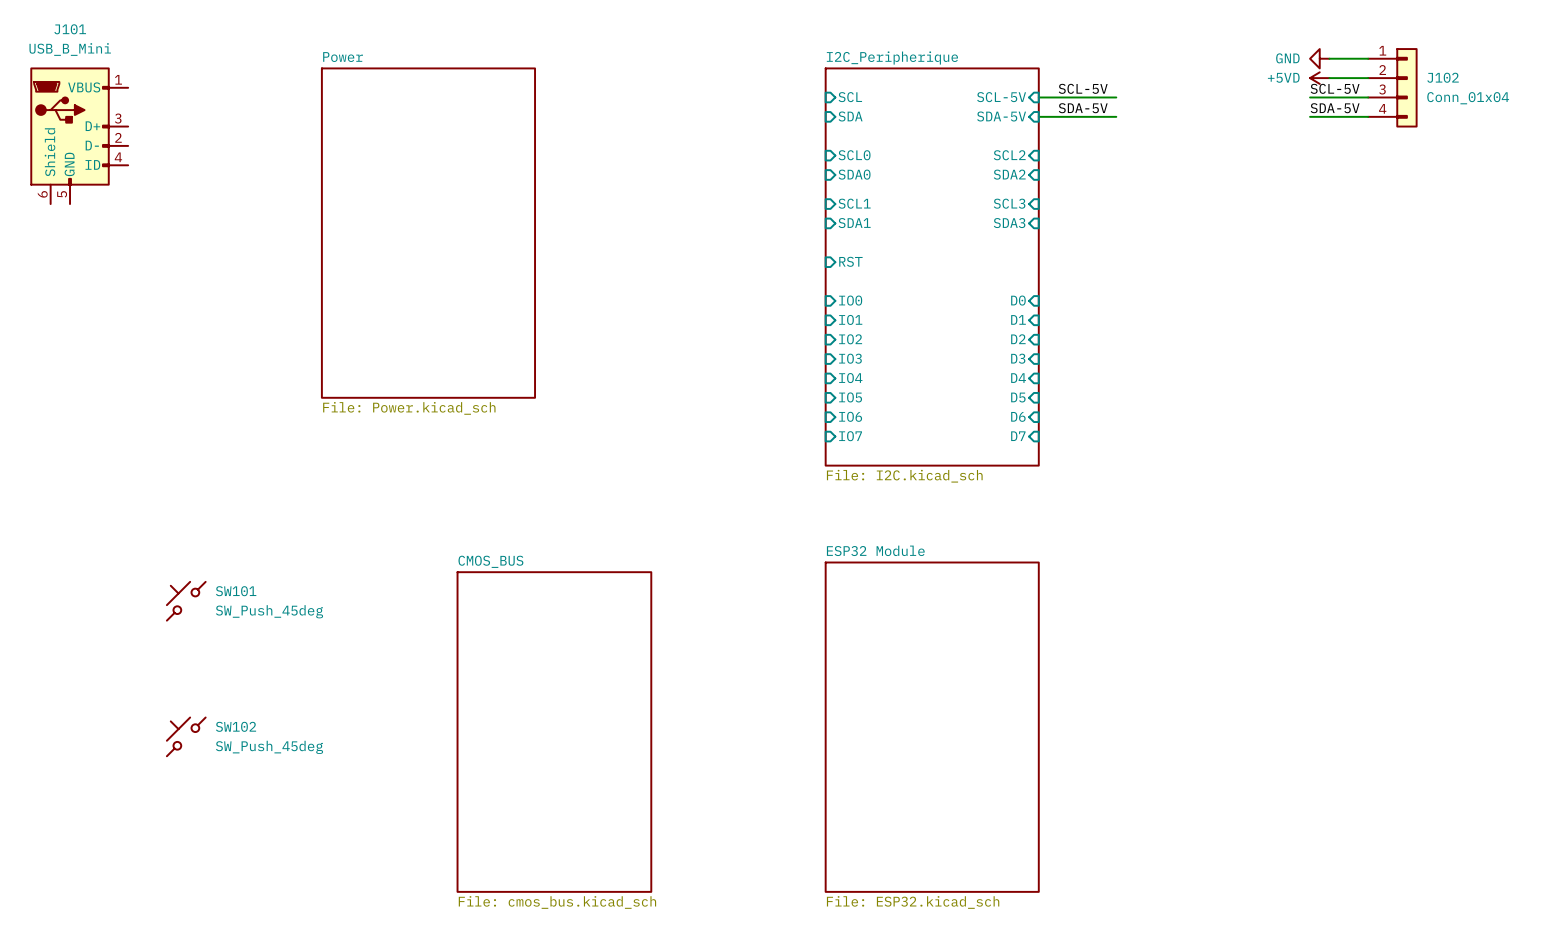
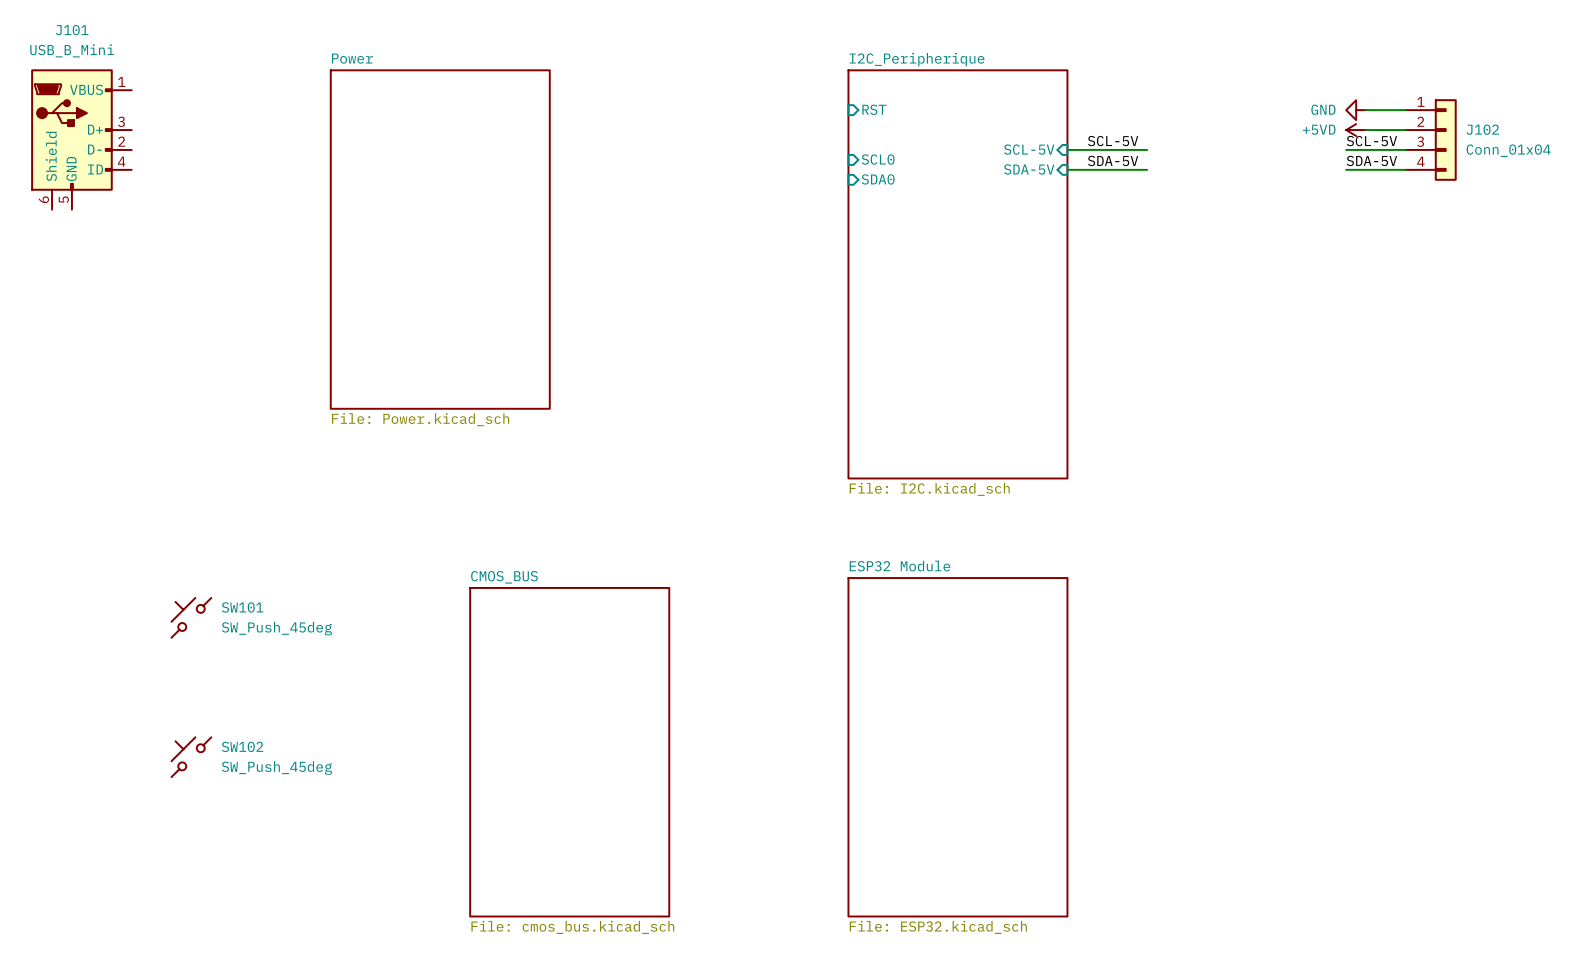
power symbol position: GND (1319, 58) -> GND (1356, 110)
wire: (1329, 58) (1368, 58) -> (1366, 110) (1405, 110)
power symbol position: +5VD (1319, 78) -> +5VD (1356, 130)
wire: (1329, 78) (1368, 78) -> (1366, 130) (1405, 130)
J102 position: (1392, 87) -> (1431, 139)
label position: SCL-5V (1083, 88) -> SCL-5V (1113, 141)
label position: SCL-5V (1335, 88) -> SCL-5V (1371, 141)
sheet pin: SCL (850, 97) -> none
sheet pin position: SCL-5V (1001, 97) -> SCL-5V (1029, 149)
wire: (1038, 97) (1116, 97) -> (1067, 149) (1147, 149)
wire: (1310, 97) (1368, 97) -> (1346, 149) (1405, 149)
label position: SDA-5V (1083, 108) -> SDA-5V (1113, 160)
label position: SDA-5V (1335, 108) -> SDA-5V (1371, 160)
sheet pin: SDA (850, 116) -> none
sheet pin position: SDA-5V (1001, 116) -> SDA-5V (1029, 169)
wire: (1038, 116) (1116, 116) -> (1067, 169) (1147, 169)
wire: (1310, 116) (1368, 116) -> (1346, 169) (1405, 169)
sheet pin: SCL2 (1009, 155) -> none
sheet pin: SDA2 (1009, 174) -> none
sheet pin: SCL1 (854, 203) -> none
sheet pin: SCL3 (1009, 203) -> none
sheet pin: SDA1 (854, 223) -> none
sheet pin: SDA3 (1009, 223) -> none
sheet pin position: RST (850, 261) -> RST (874, 109)
sheet pin: IO0 (850, 300) -> none
sheet pin: D0 (1018, 300) -> none
sheet pin: IO1 (850, 319) -> none
sheet pin: D1 (1018, 319) -> none
sheet pin: IO2 (850, 339) -> none
sheet pin: D2 (1018, 339) -> none
sheet pin: IO3 (850, 358) -> none
sheet pin: D3 (1018, 358) -> none
sheet pin: IO4 (850, 378) -> none
sheet pin: D4 (1018, 378) -> none
sheet pin: IO5 (850, 397) -> none
sheet pin: D5 (1018, 397) -> none
sheet pin: IO6 (850, 416) -> none
sheet pin: D6 (1018, 416) -> none
sheet pin: IO7 (850, 436) -> none
sheet pin: D7 (1018, 436) -> none

